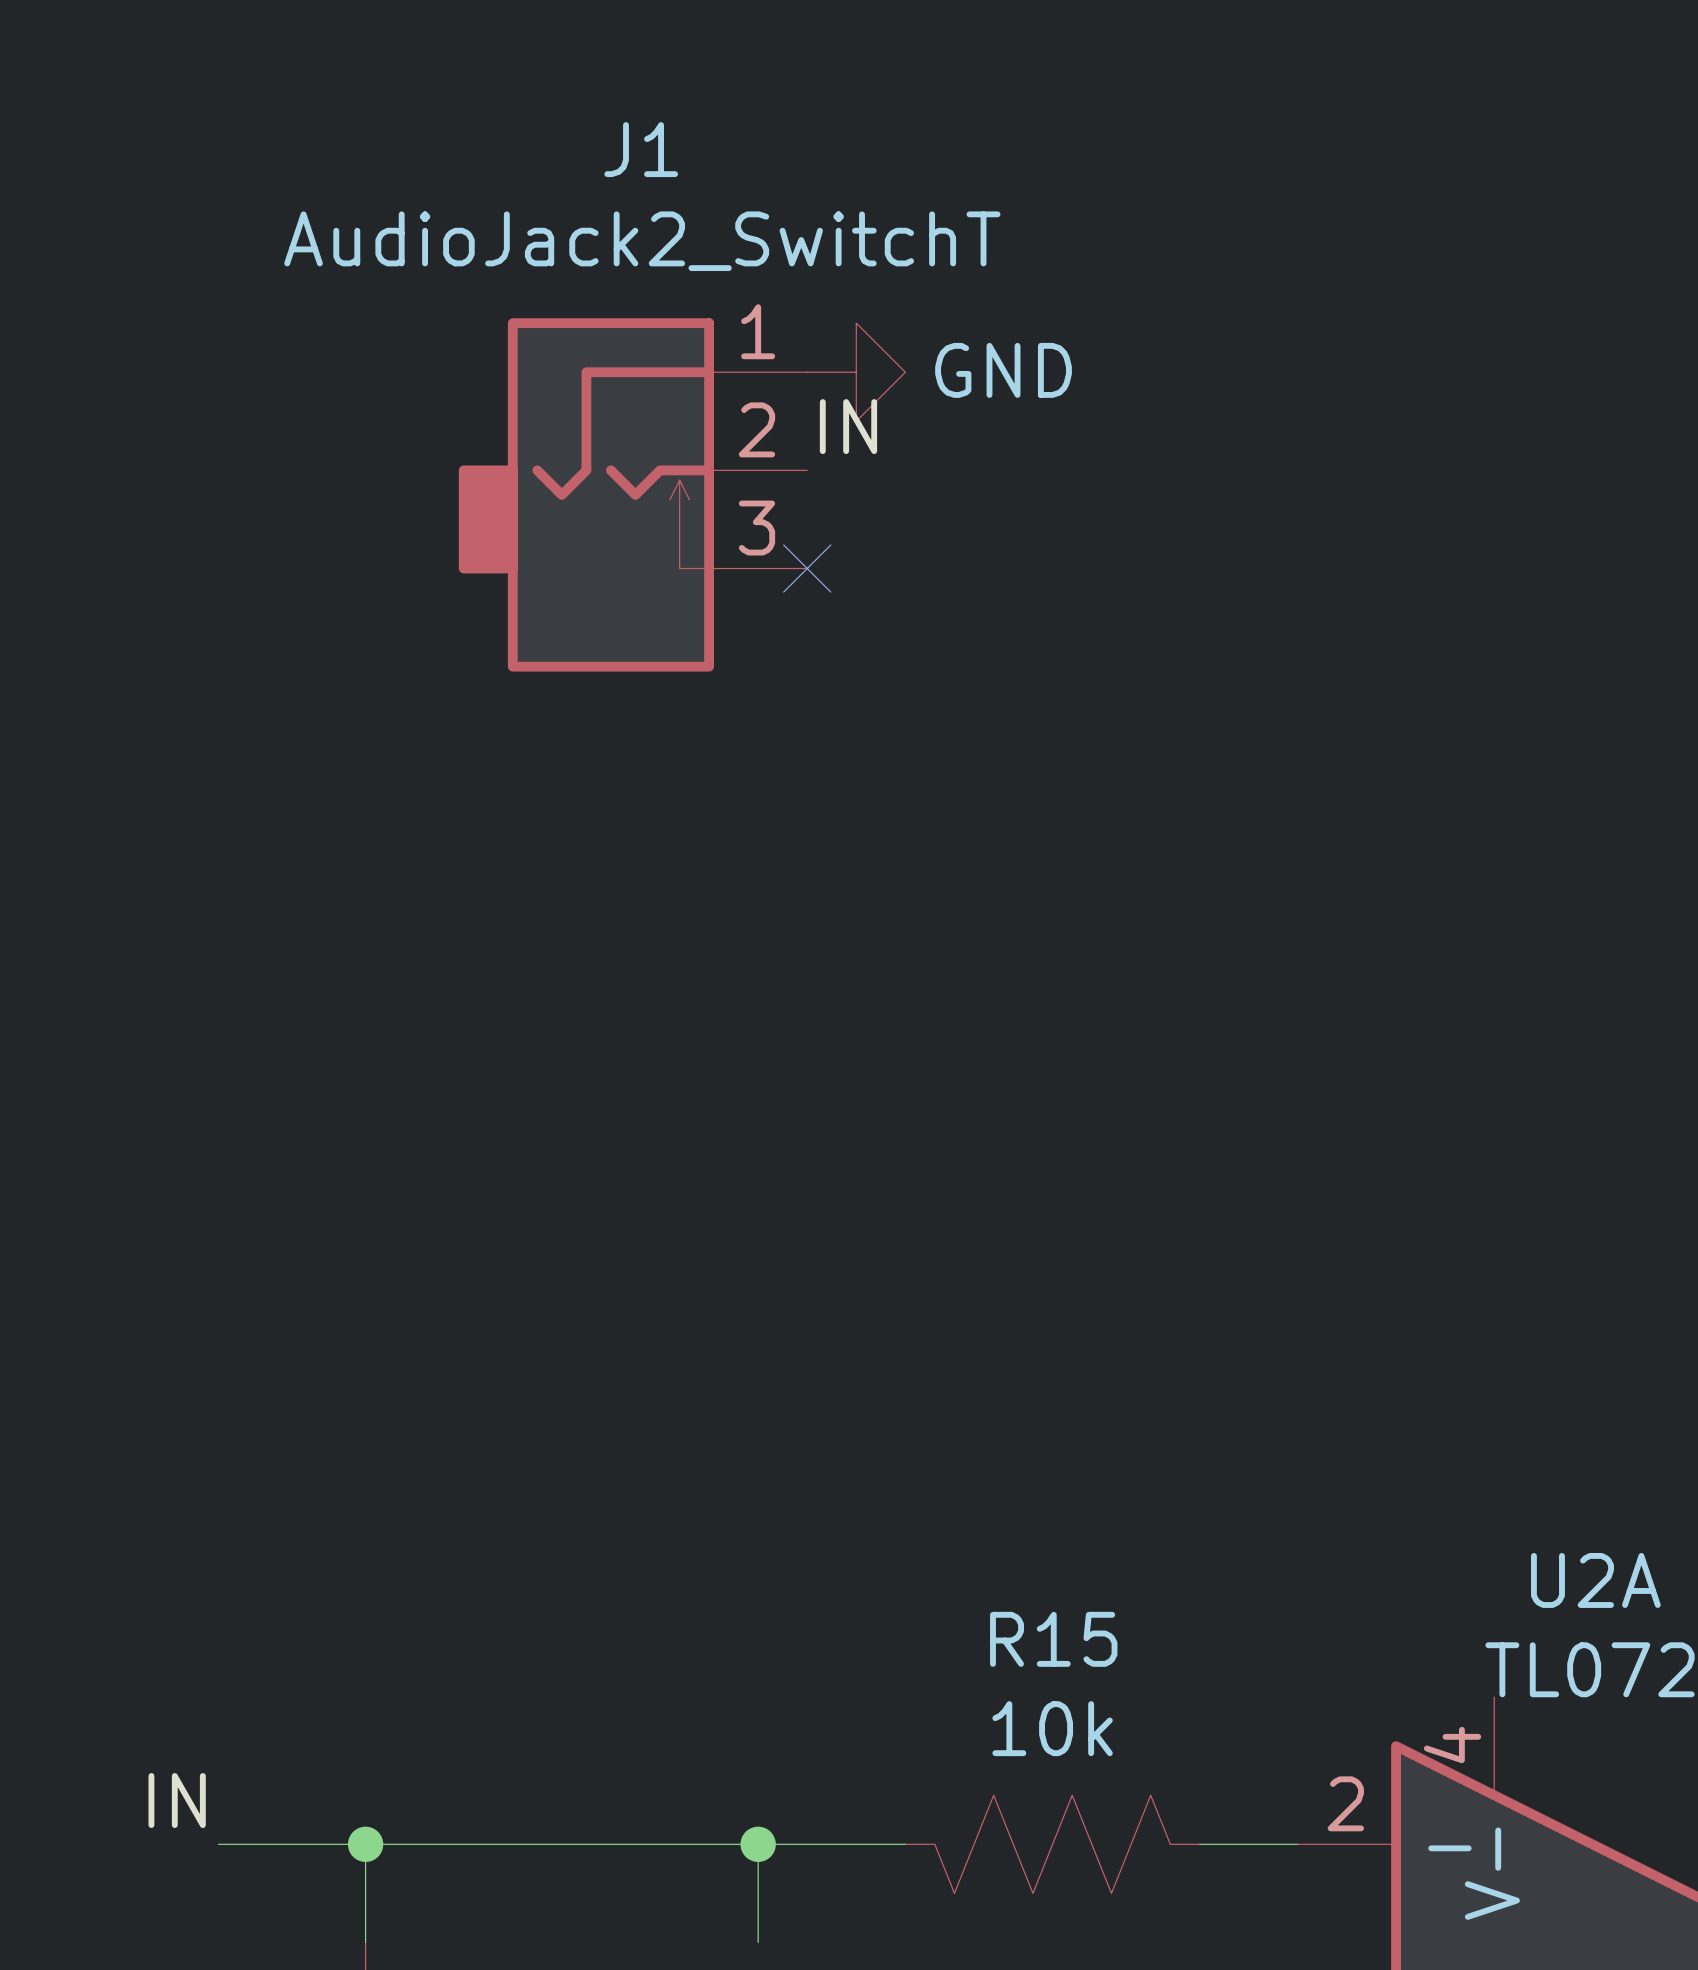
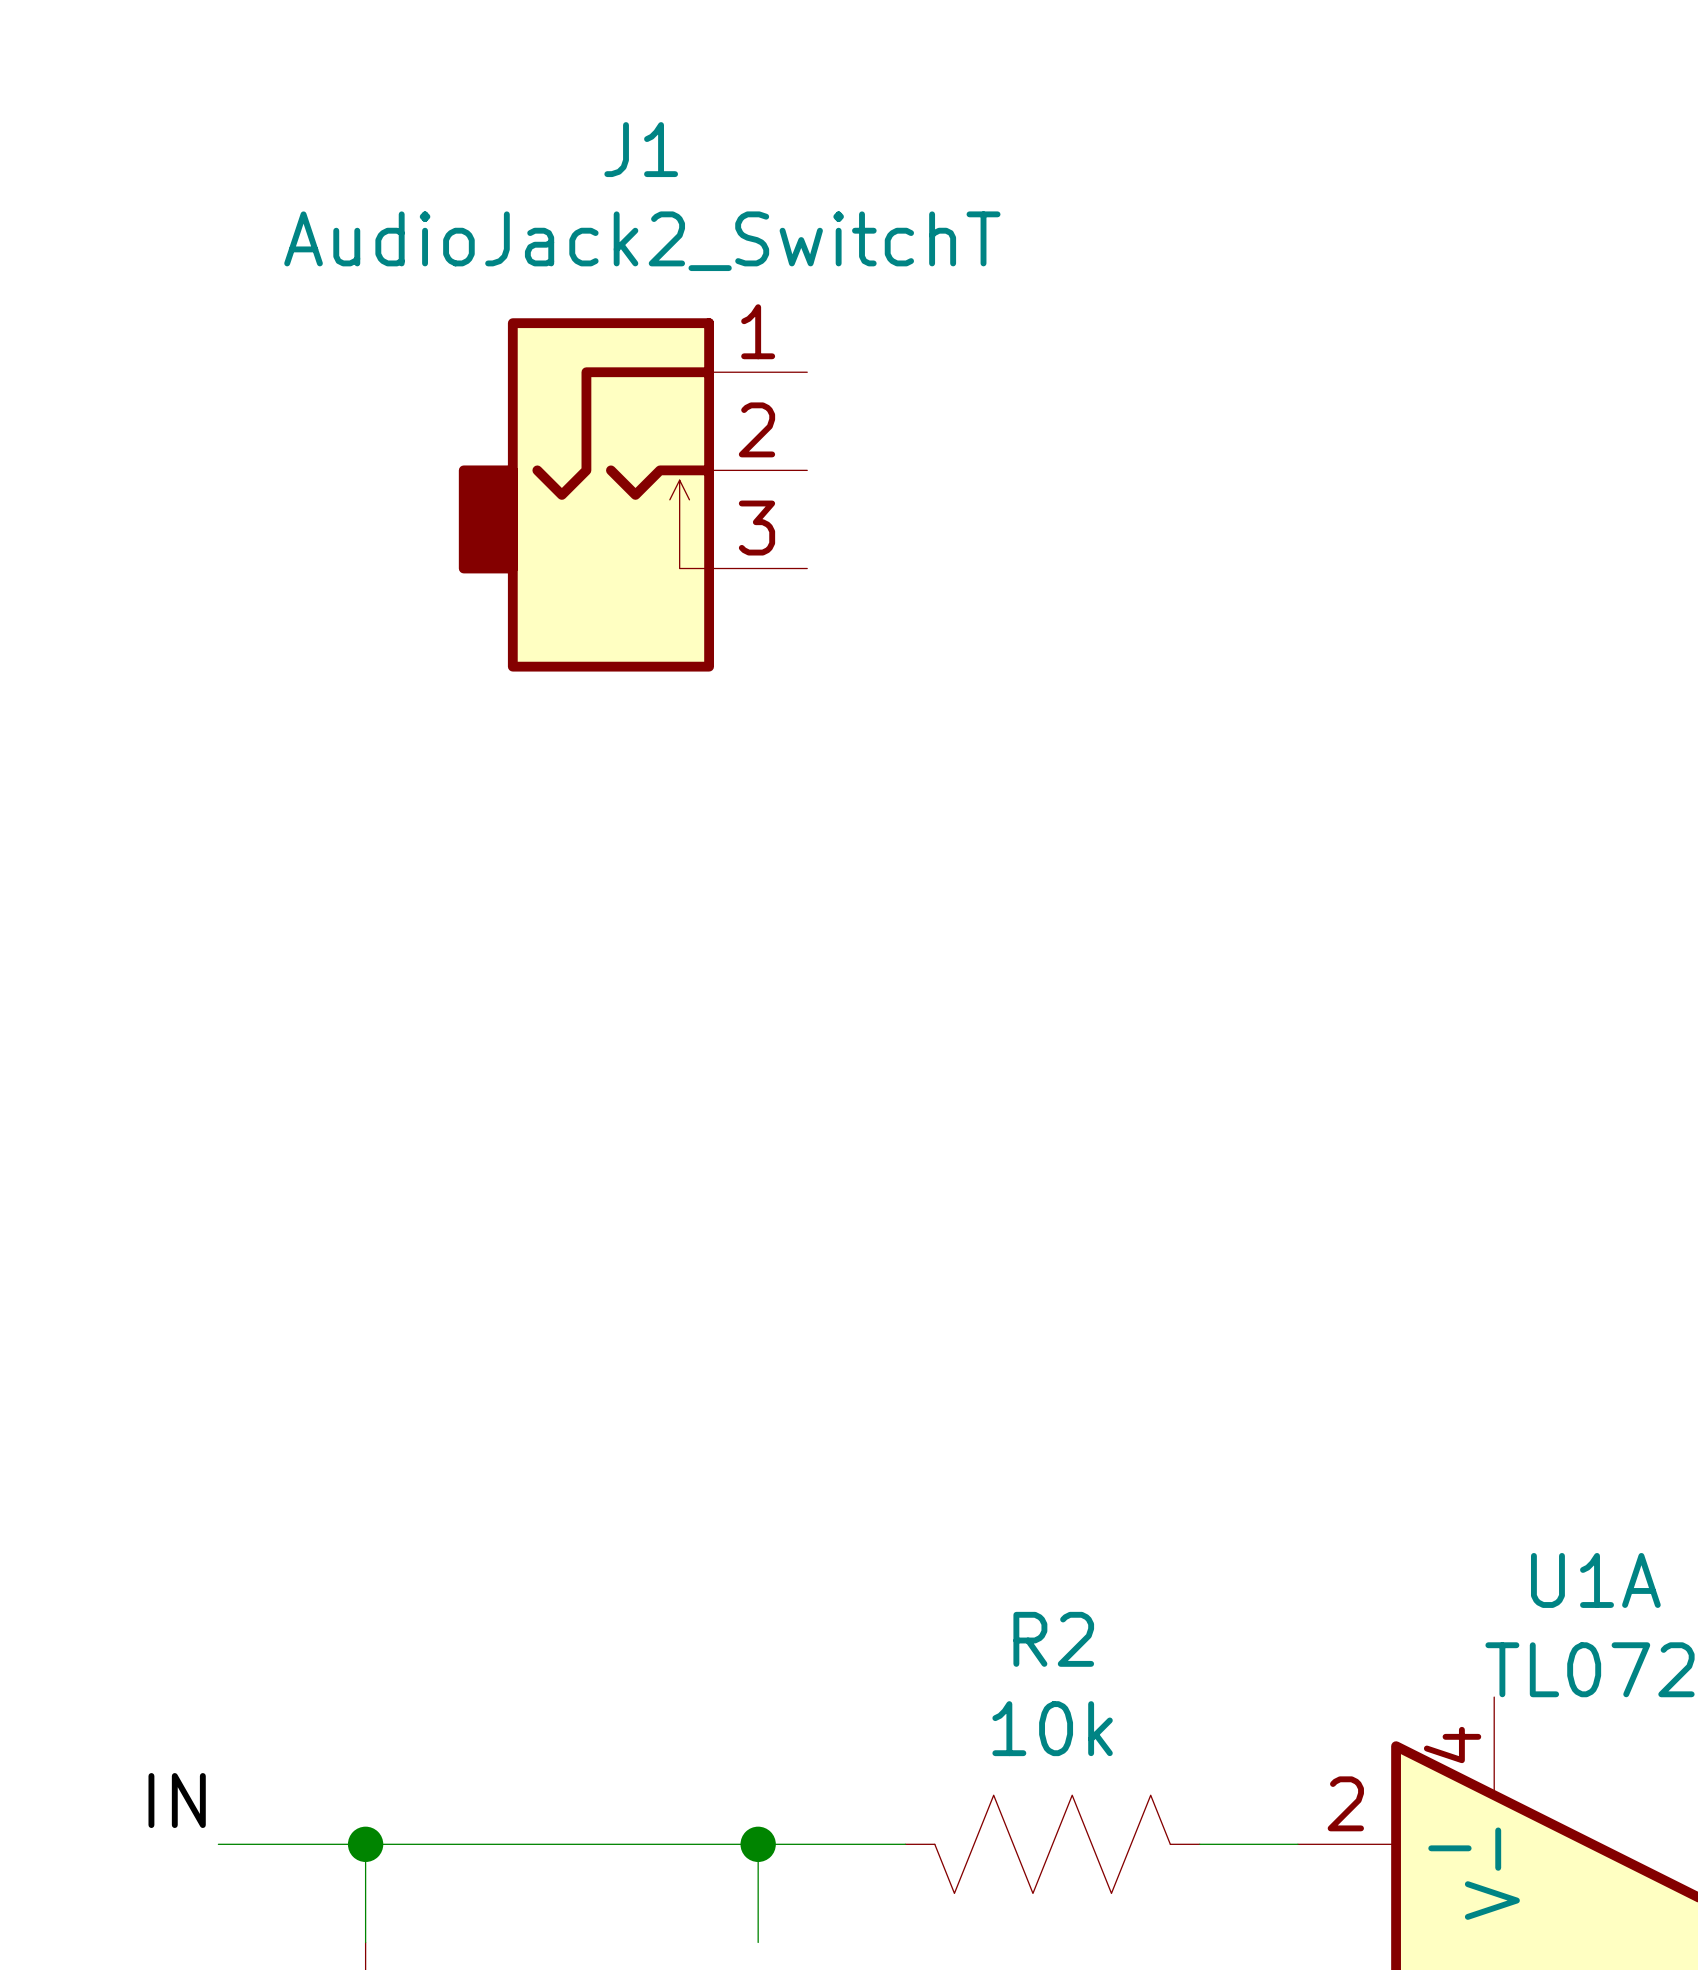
power symbol: GND (856, 372) -> none
label: IN (848, 426) -> none
no-connect mark: (807, 568) -> none
U2A name: U2A (1595, 1580) -> U1A (1595, 1580)
R15 name: R15 (1053, 1639) -> R2 (1053, 1639)

